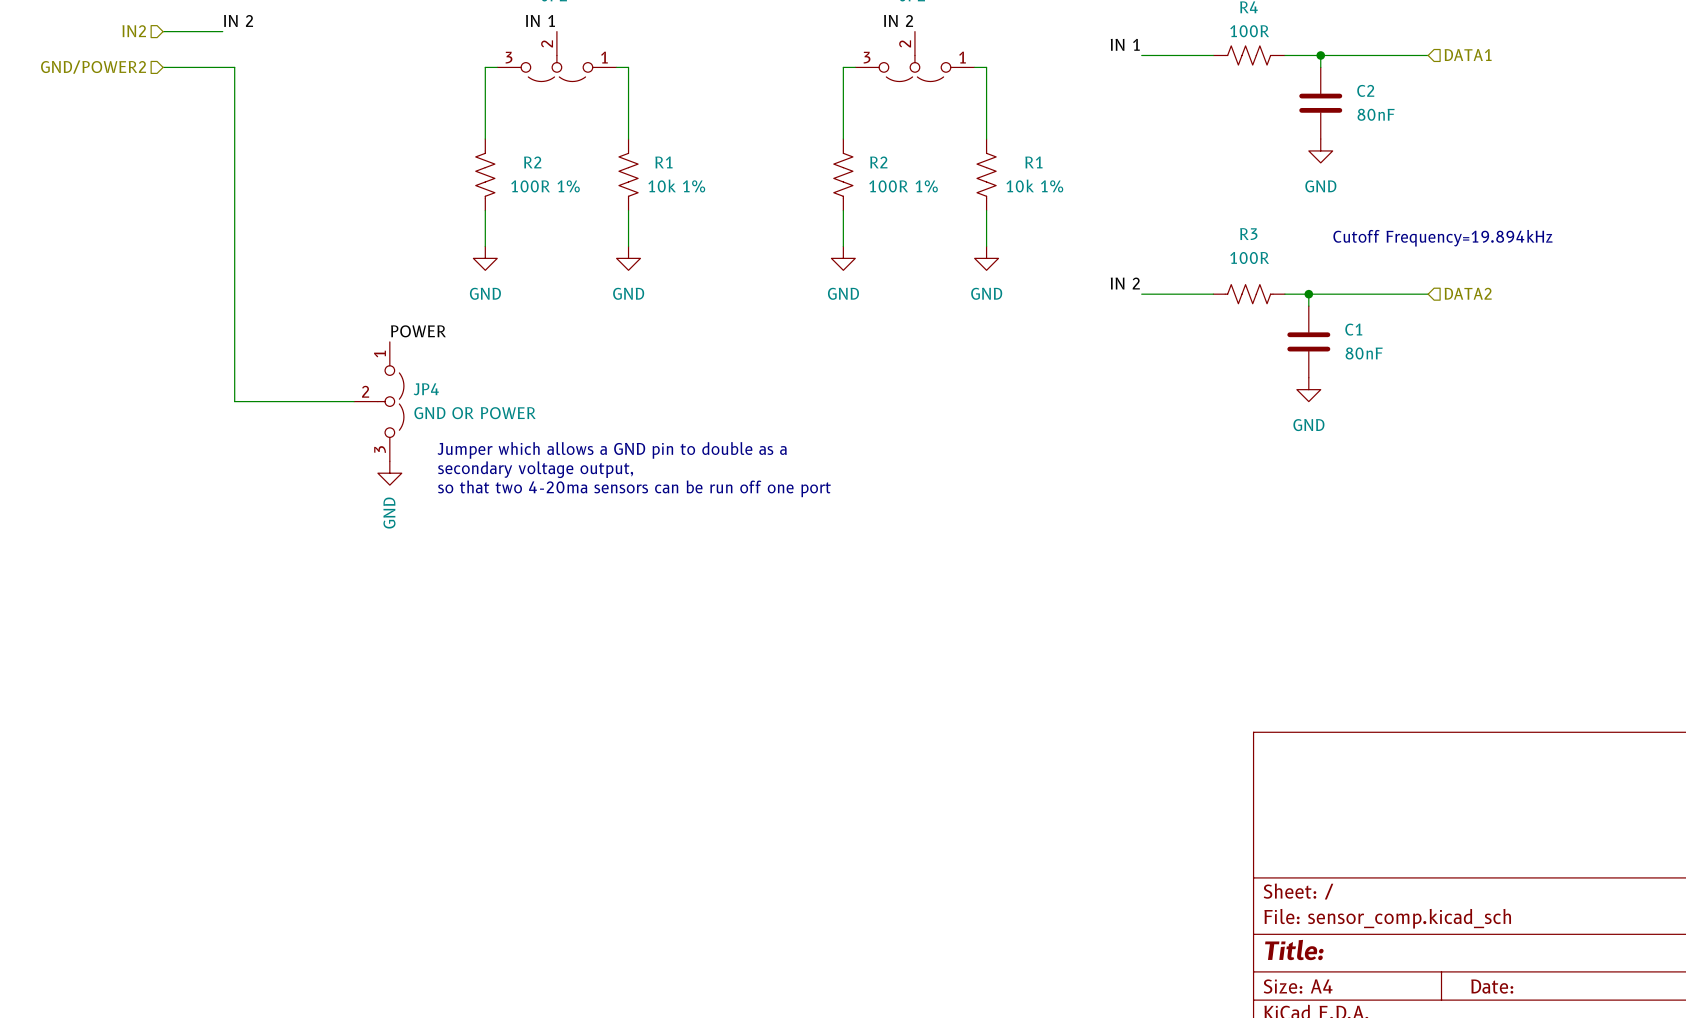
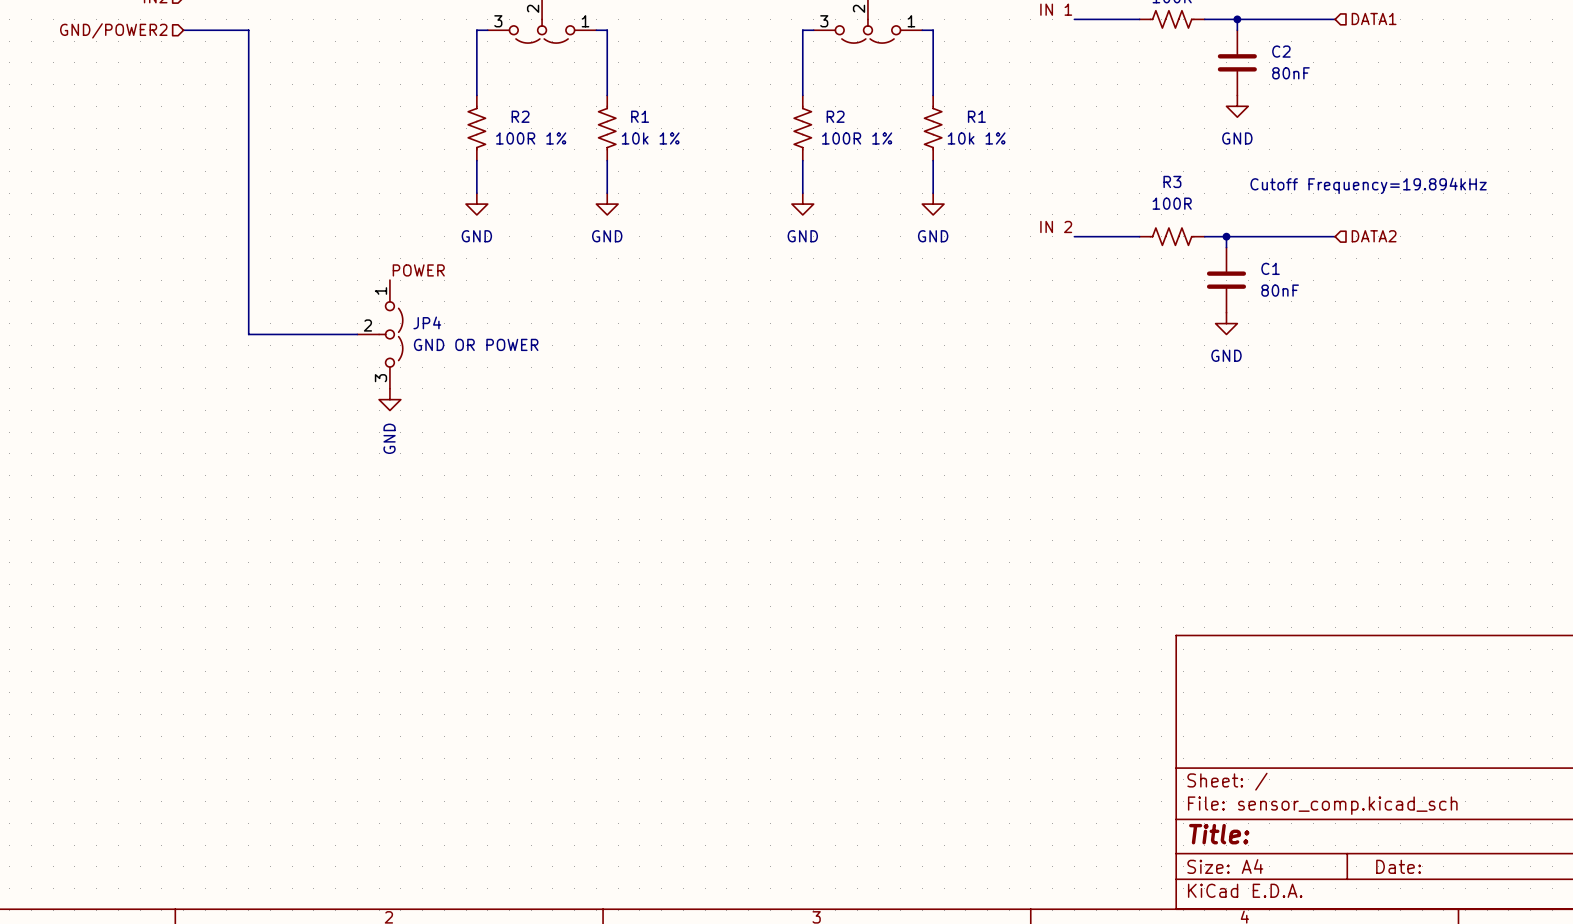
text: Jumper which allows a GND pin to double as a (612, 450) -> none
text: secondary voltage output, (535, 469) -> none
text: so that two 4-20ma sensors can be run off one port (634, 488) -> none

